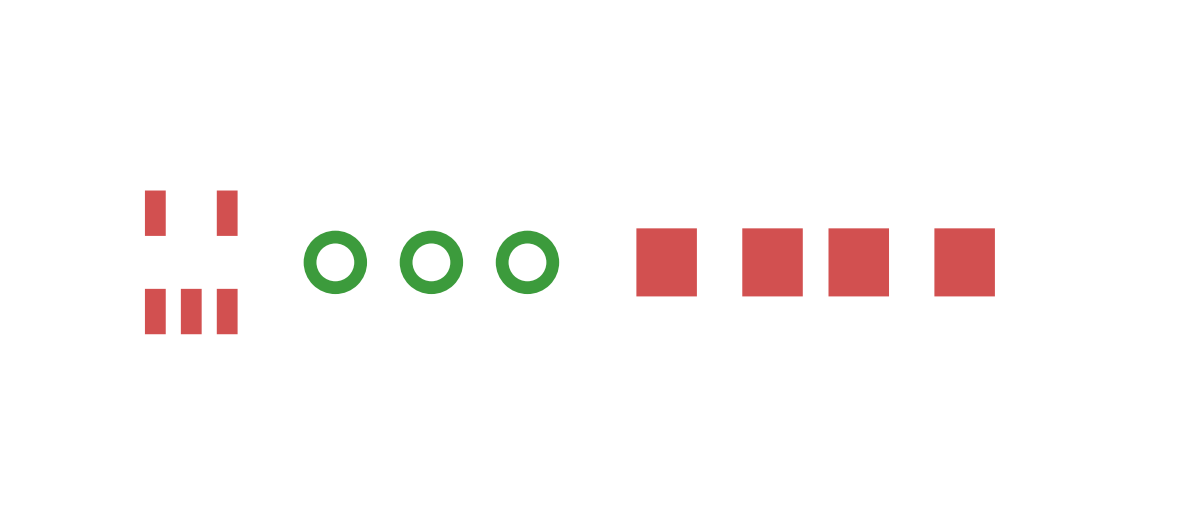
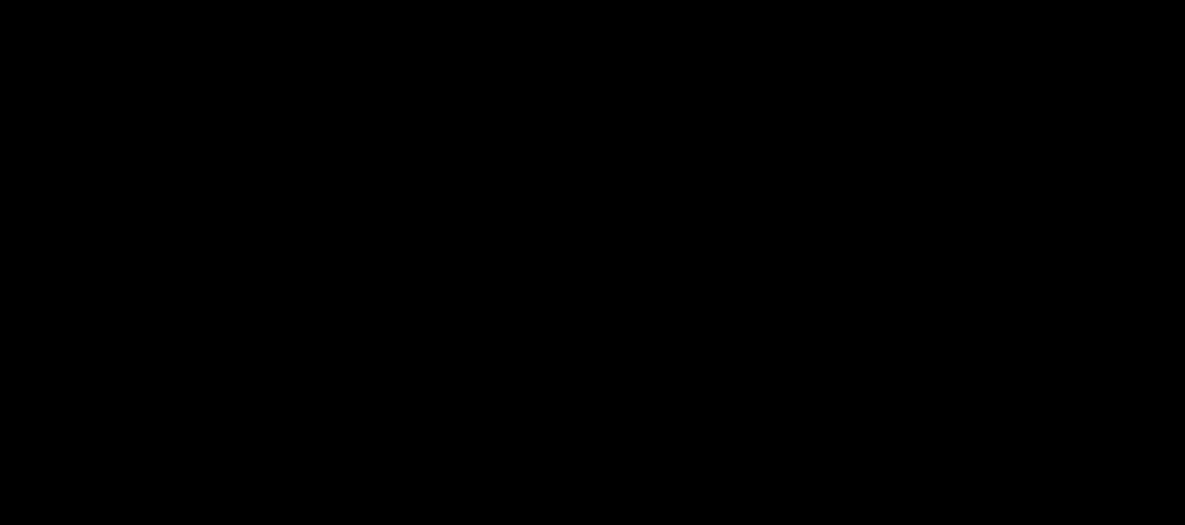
part: (191, 262) -> none
part: (431, 262) -> none
part: (719, 262) -> none
part: (911, 262) -> none

